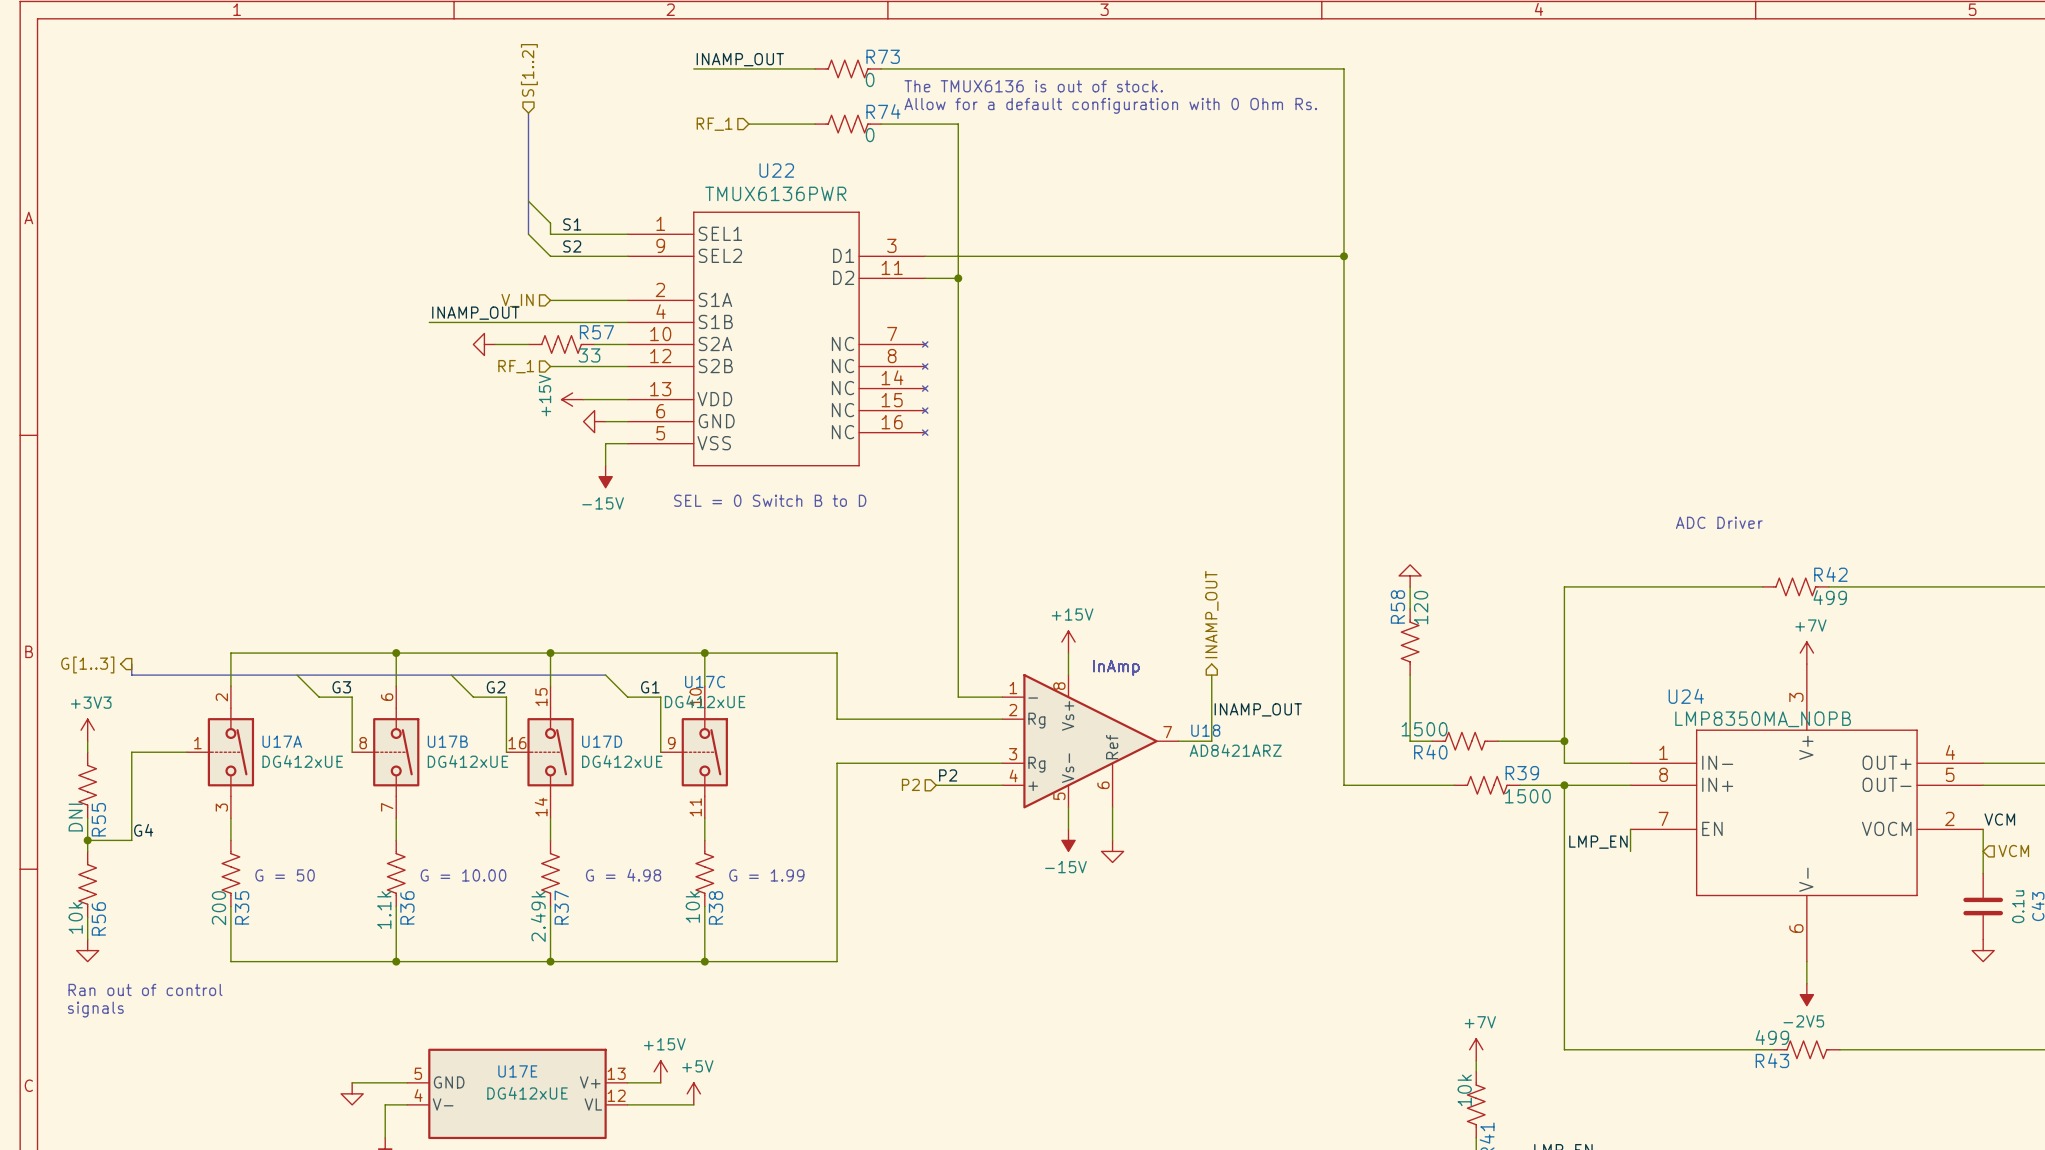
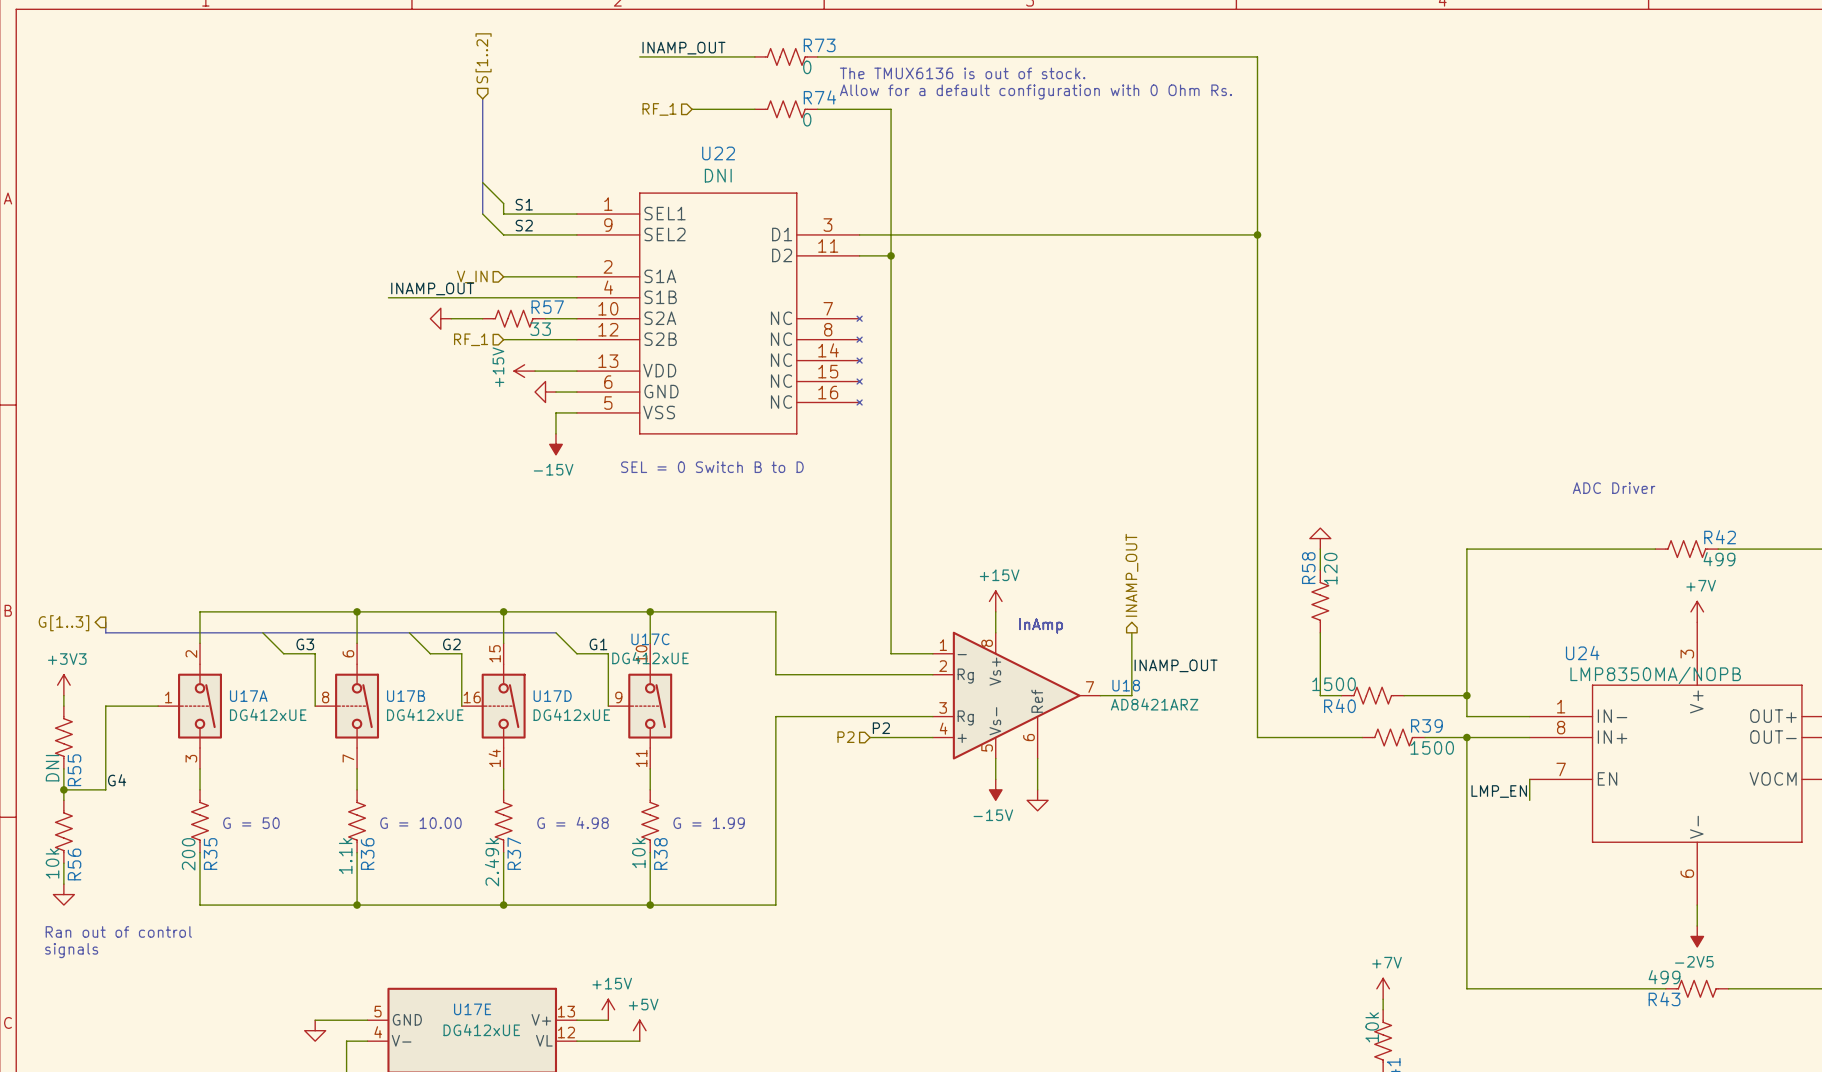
U22 value: TMUX6136PWR (775, 193) -> DNI (718, 175)
U24 value: LMP8350MA_NOPB (1763, 719) -> LMP8350MA/NOPB (1655, 675)

